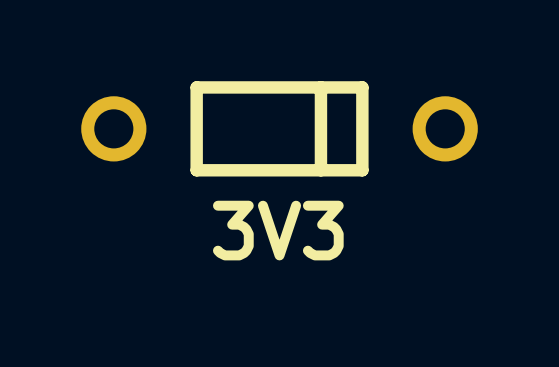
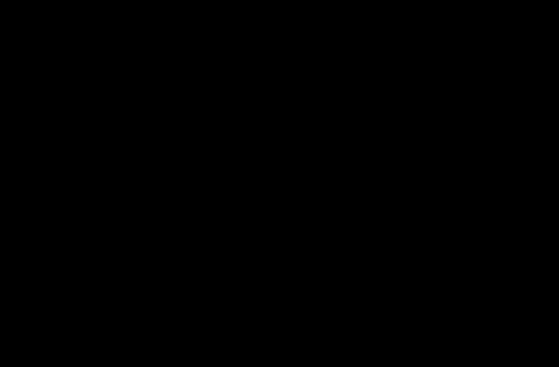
part: 3V3 (279, 128) -> none

